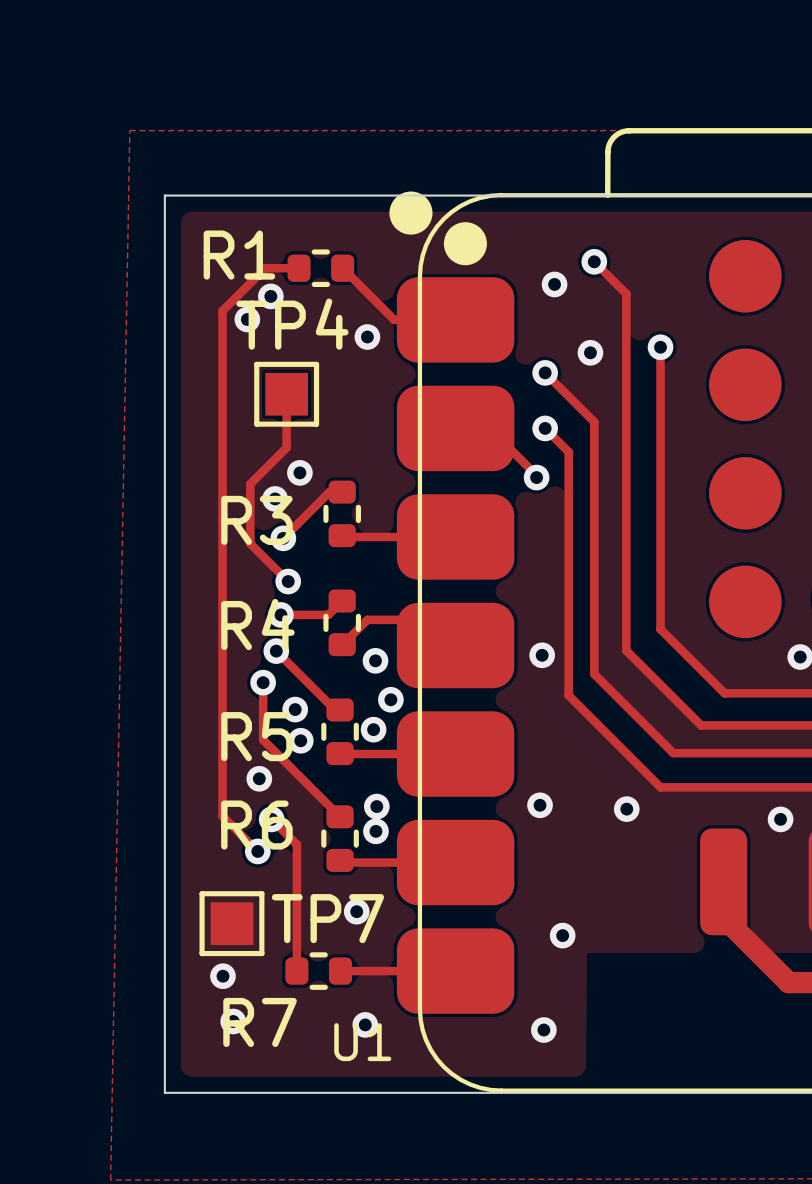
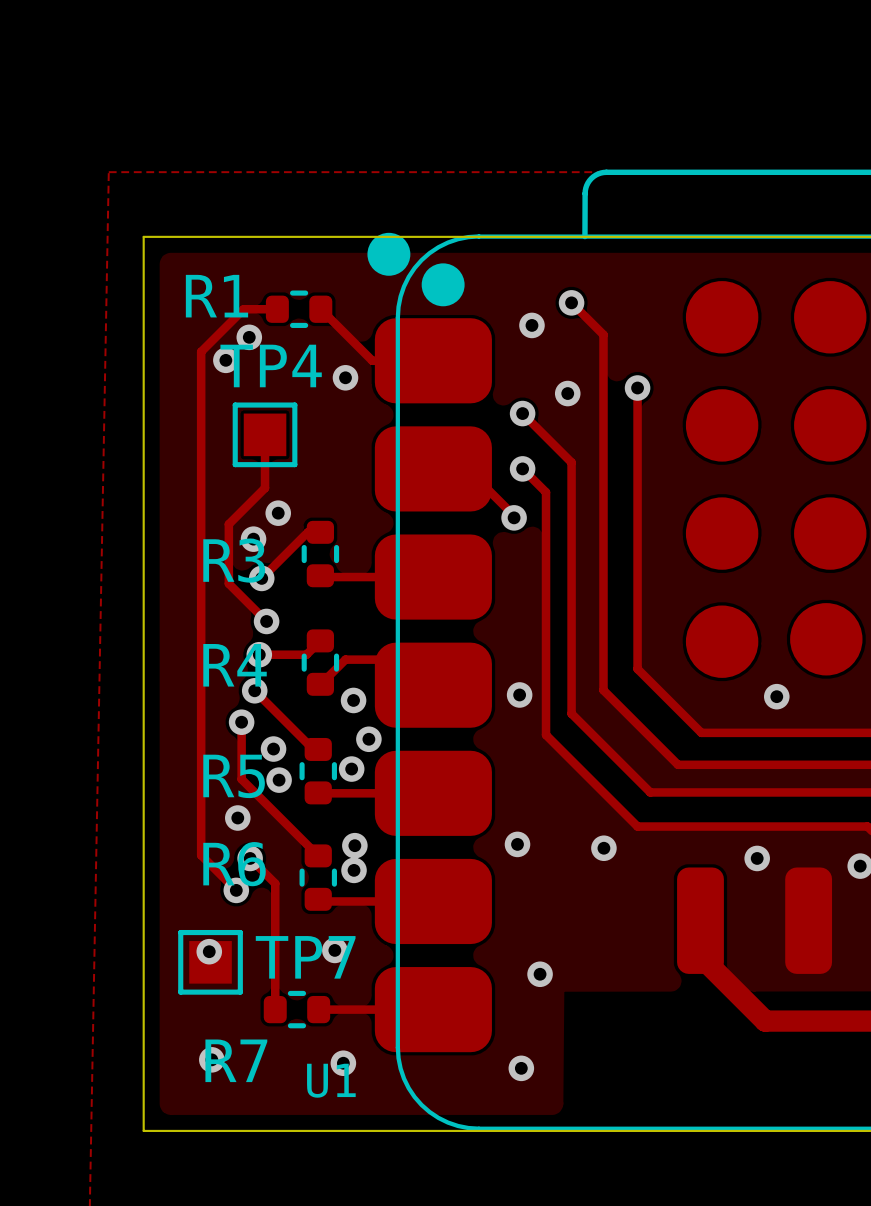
via position: (222, 976) -> (209, 951)

